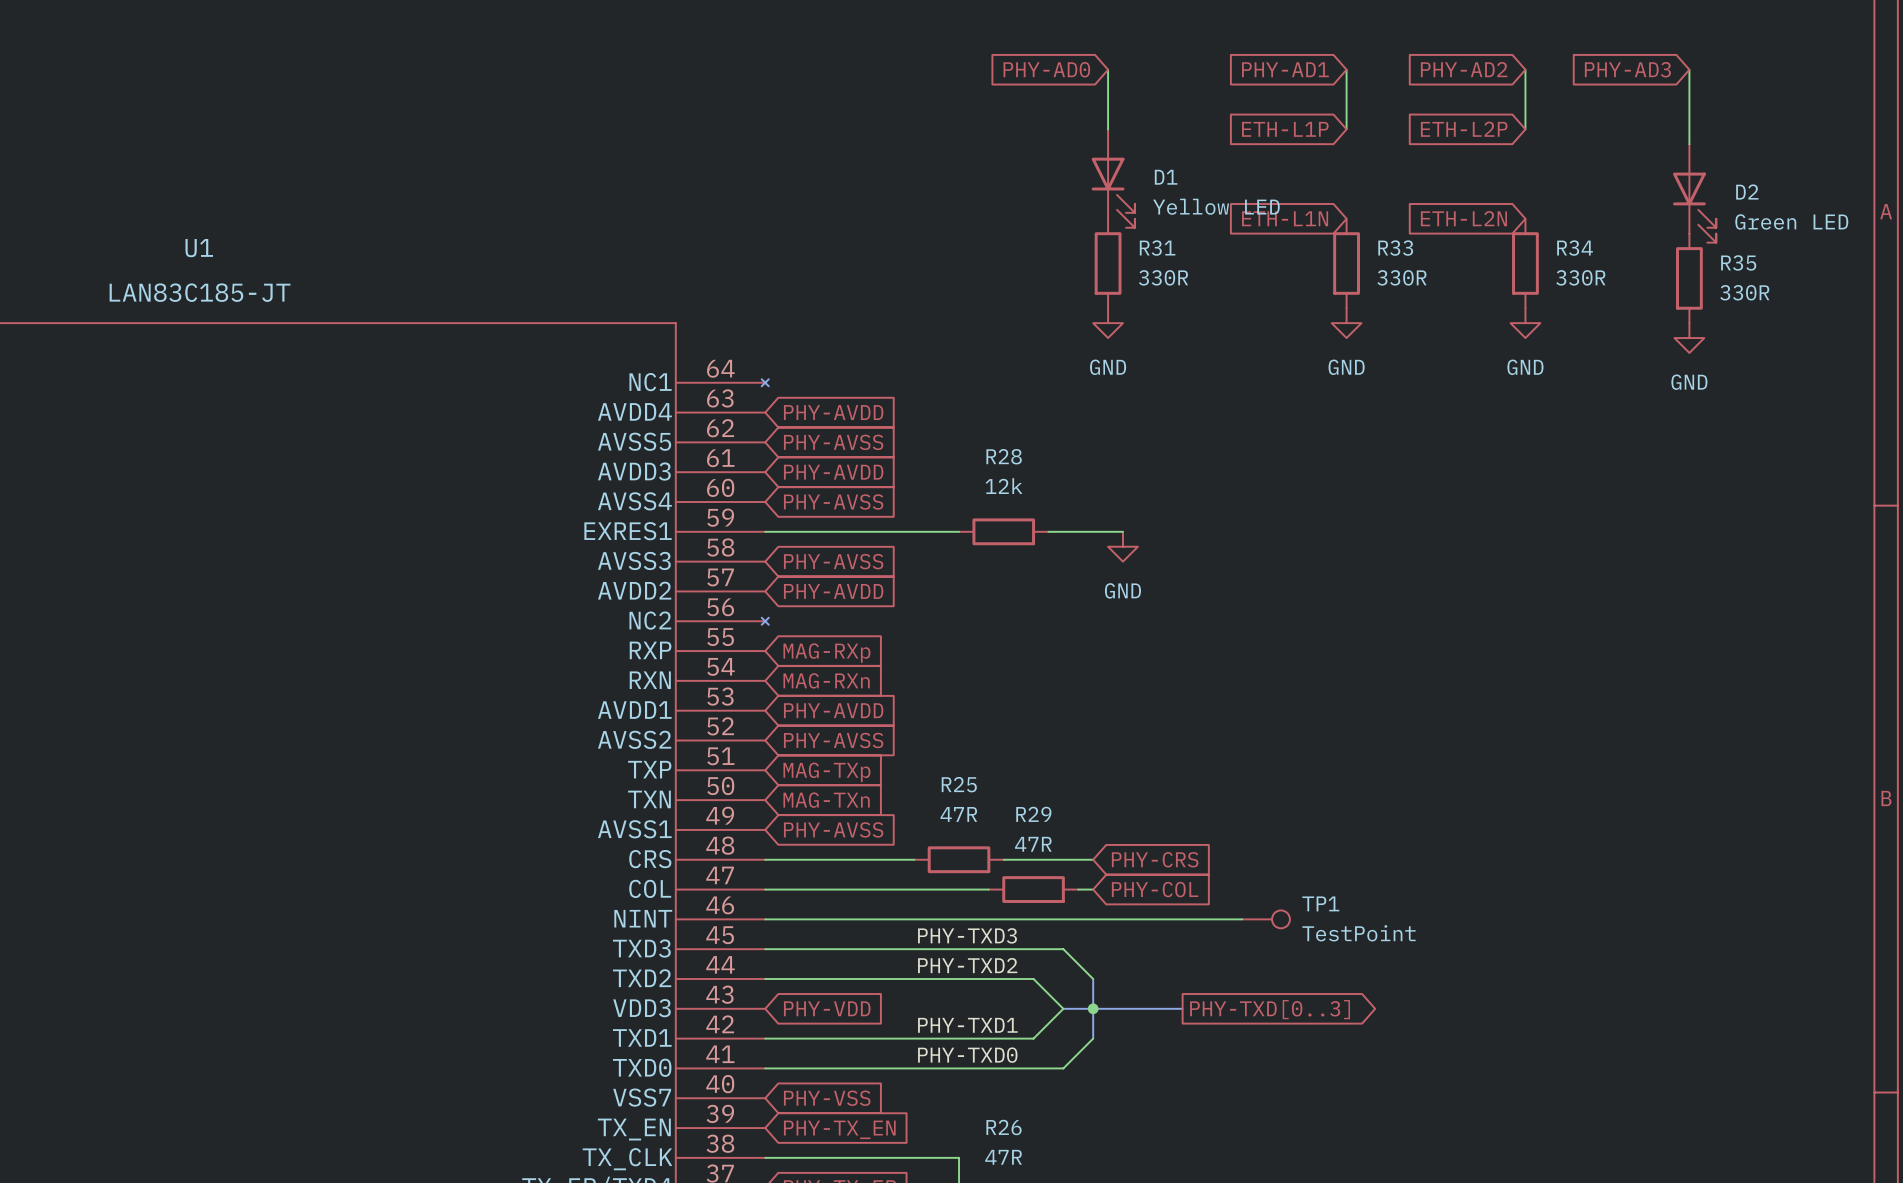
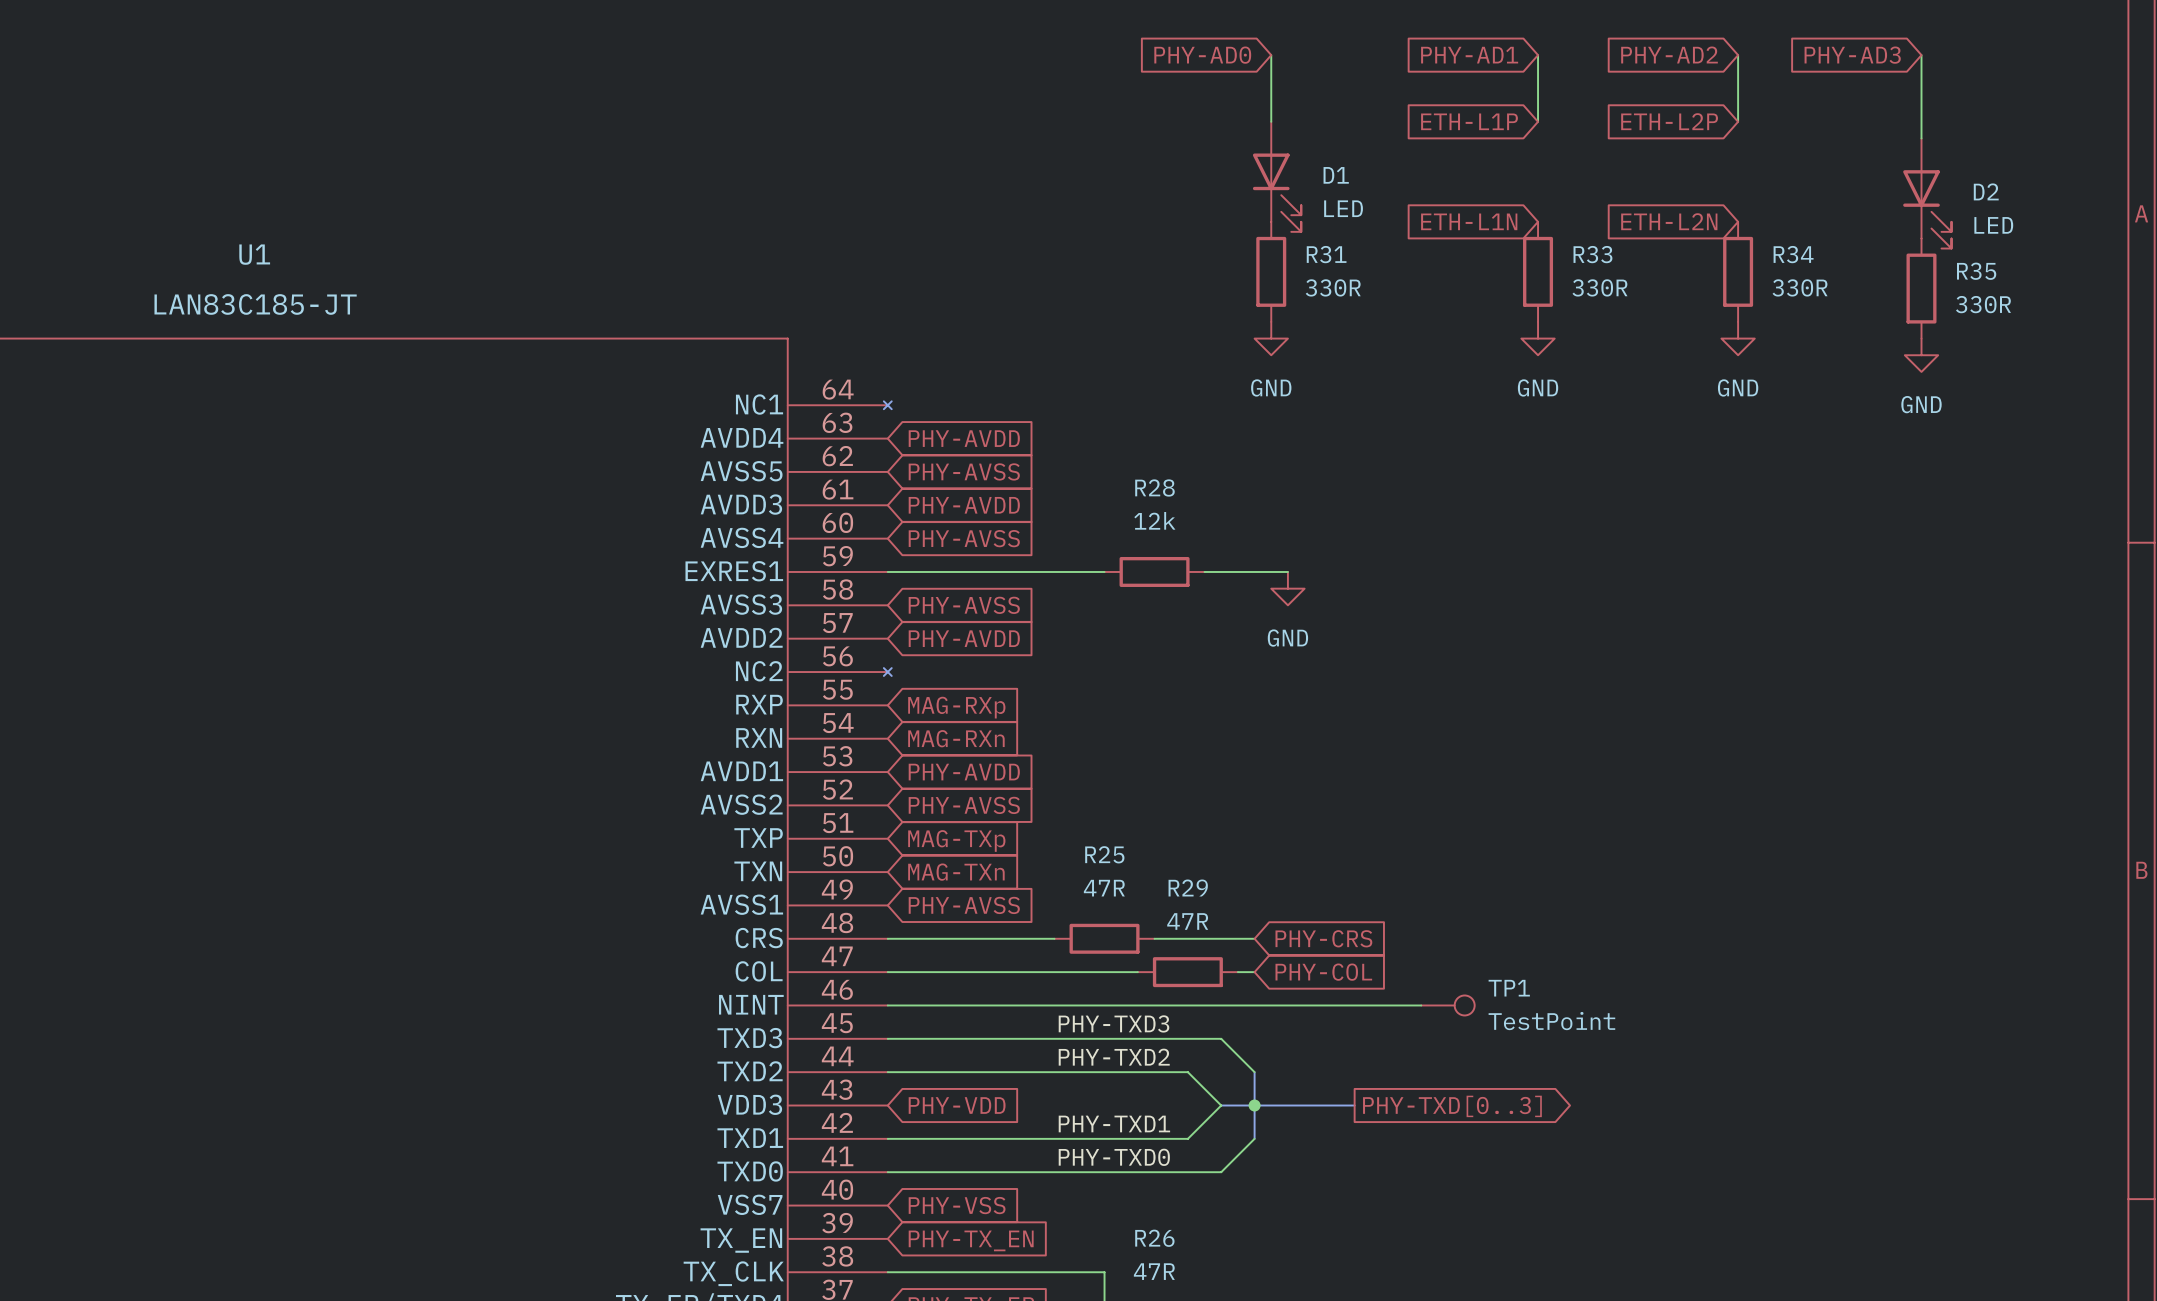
D1 value: Yellow LED (1216, 206) -> LED (1343, 208)
D2 value: Green LED (1791, 221) -> LED (1993, 225)

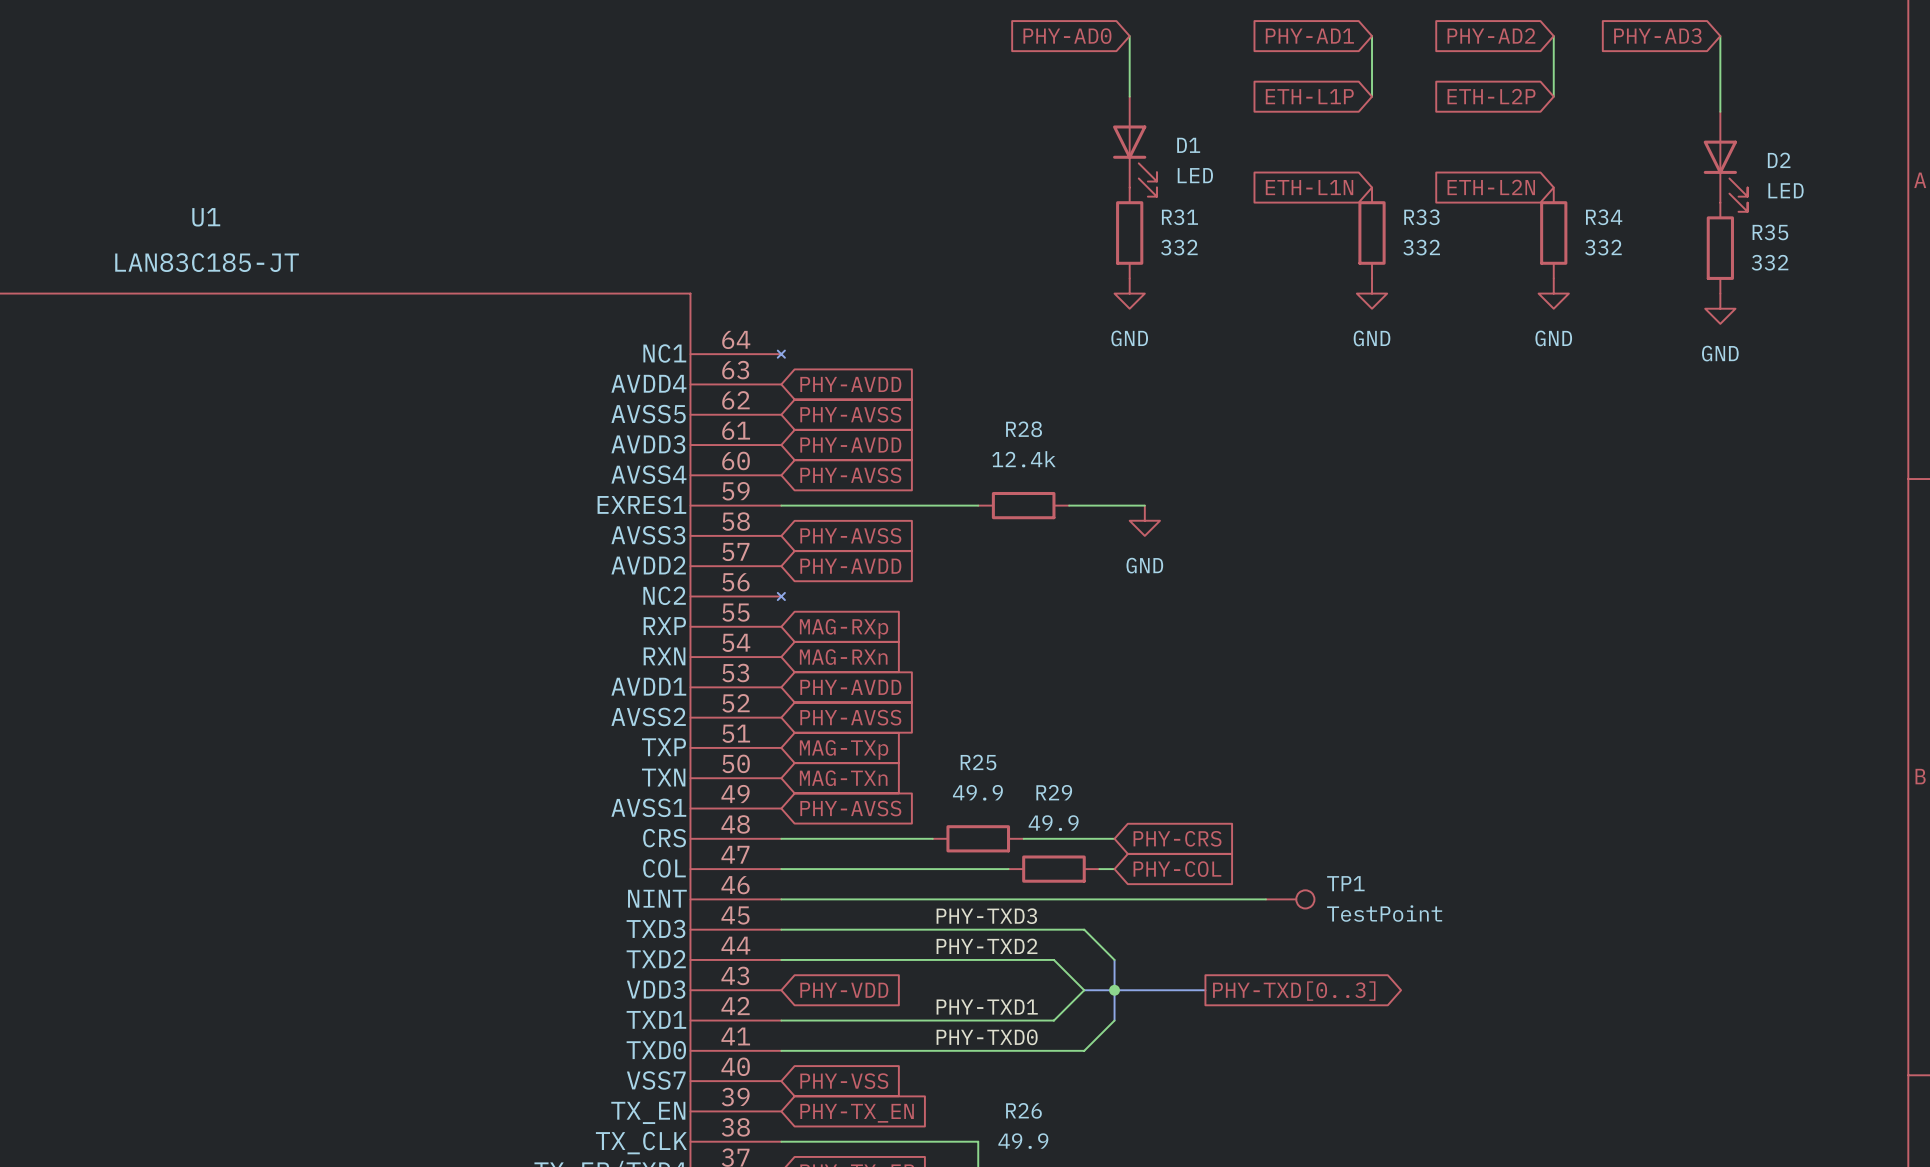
R31 value: 330R (1333, 287) -> 332 (1179, 247)
R33 value: 330R (1600, 287) -> 332 (1421, 247)
R34 value: 330R (1800, 287) -> 332 (1603, 247)
R35 value: 330R (1983, 304) -> 332 (1770, 262)
R28 value: 12k (1154, 520) -> 12.4k (1023, 459)
R25 value: 47R (1104, 888) -> 49.9 (977, 792)
R29 value: 47R (1187, 921) -> 49.9 (1053, 823)
R26 value: 47R (1154, 1271) -> 49.9 (1023, 1141)

